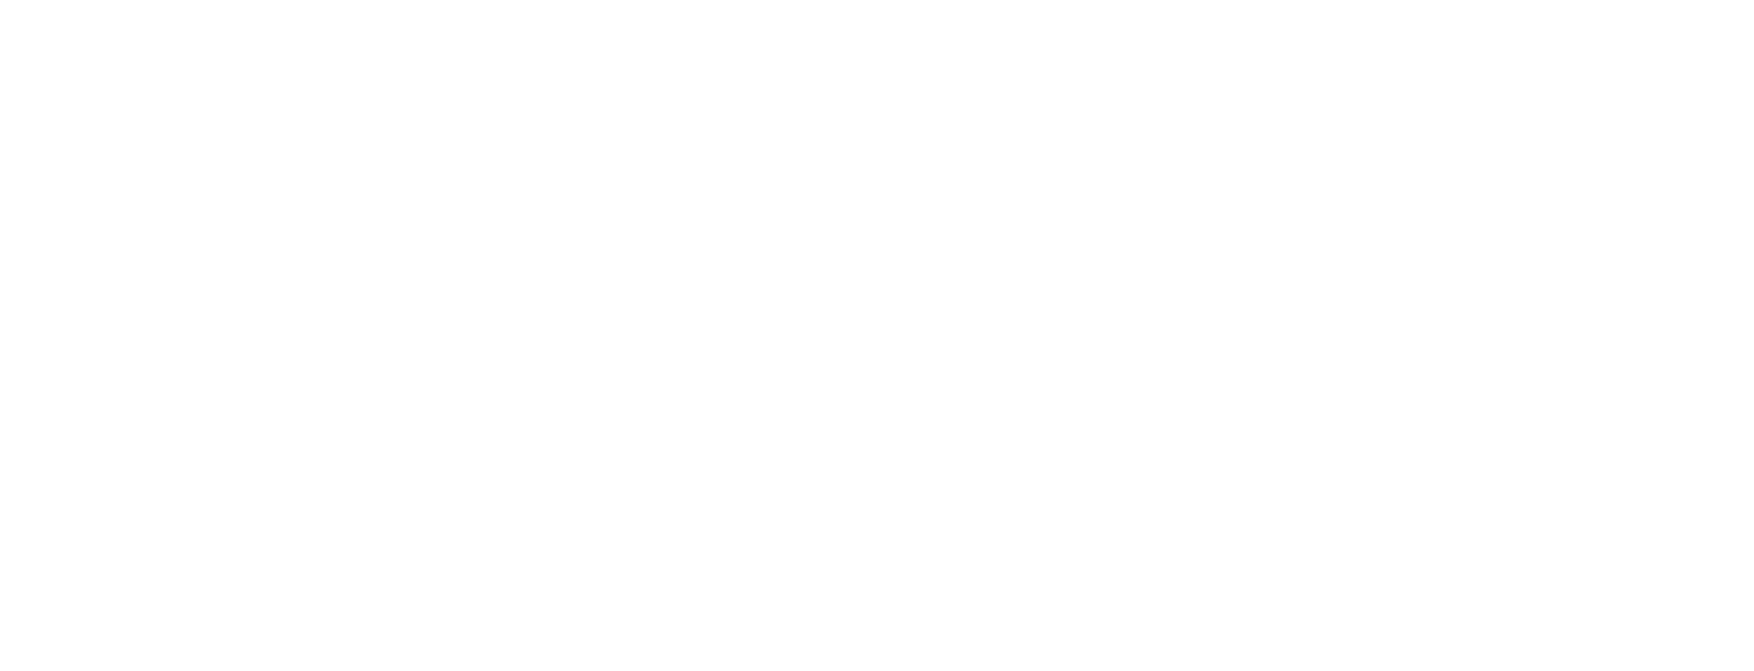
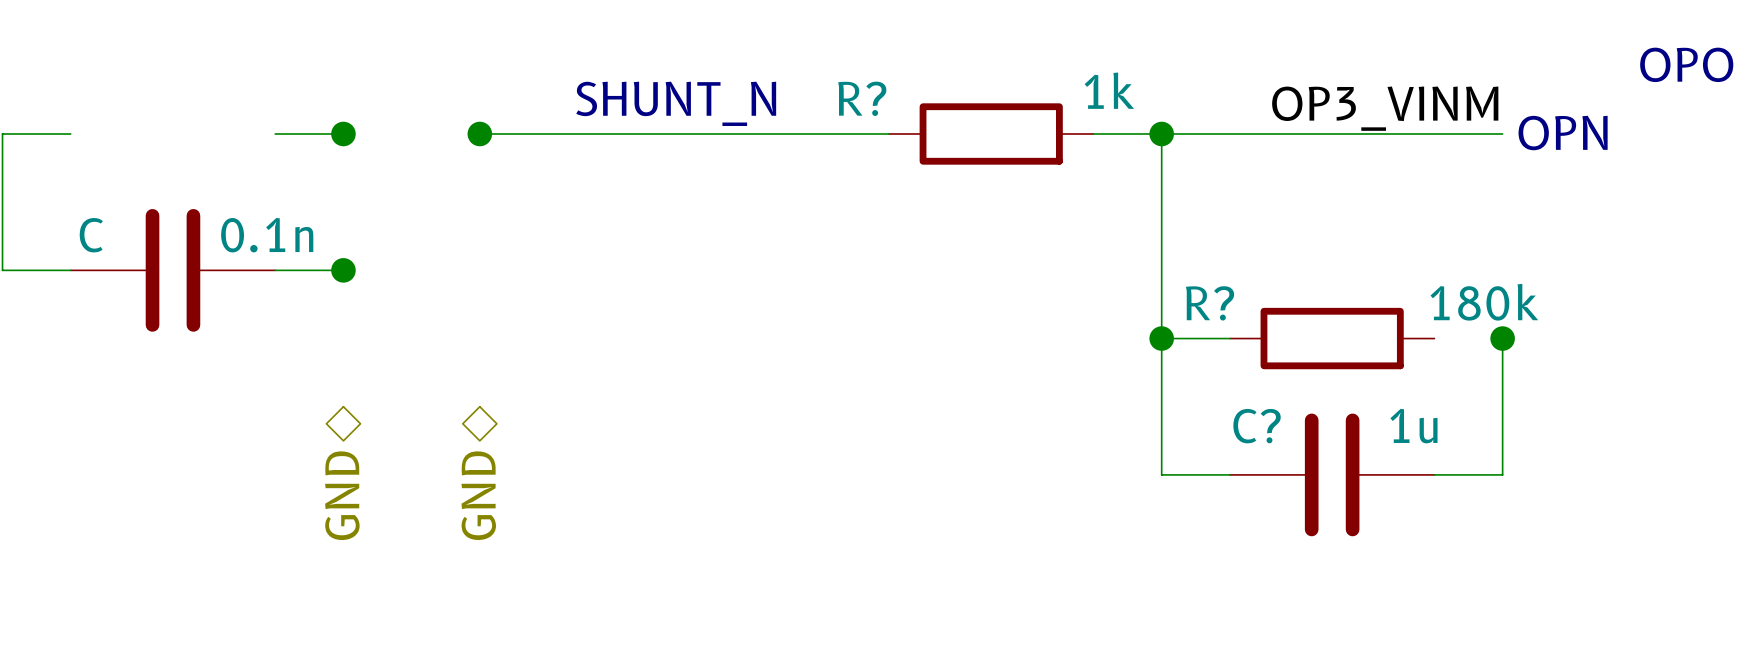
text: none -> OPO (1686, 64)
text: none -> SHUNT_N (676, 103)
label: none -> OP3_VINM (1385, 108)
text: none -> OPN (1563, 133)
wire: none -> (70, 133) (2, 133) (2, 270) (70, 270)
wire: none -> (275, 133) (343, 133)
junction: none -> (343, 133)
wire: none -> (479, 133) (888, 133)
junction: none -> (479, 133)
R?: none -> 1k (991, 133)
wire: none -> (1093, 133) (1502, 133)
wire: none -> (1161, 133) (1161, 474) (1229, 474)
junction: none -> (1161, 133)
C: none -> 0.1n (172, 270)
wire: none -> (275, 270) (343, 270)
junction: none -> (343, 270)
wire: none -> (1161, 338) (1229, 338)
junction: none -> (1161, 338)
R?: none -> 180k (1332, 338)
wire: none -> (1502, 338) (1502, 474) (1434, 474)
junction: none -> (1502, 338)
C?: none -> 1u (1332, 474)
hierarchical label: none -> GND (342, 495)
hierarchical label: none -> GND (478, 495)

